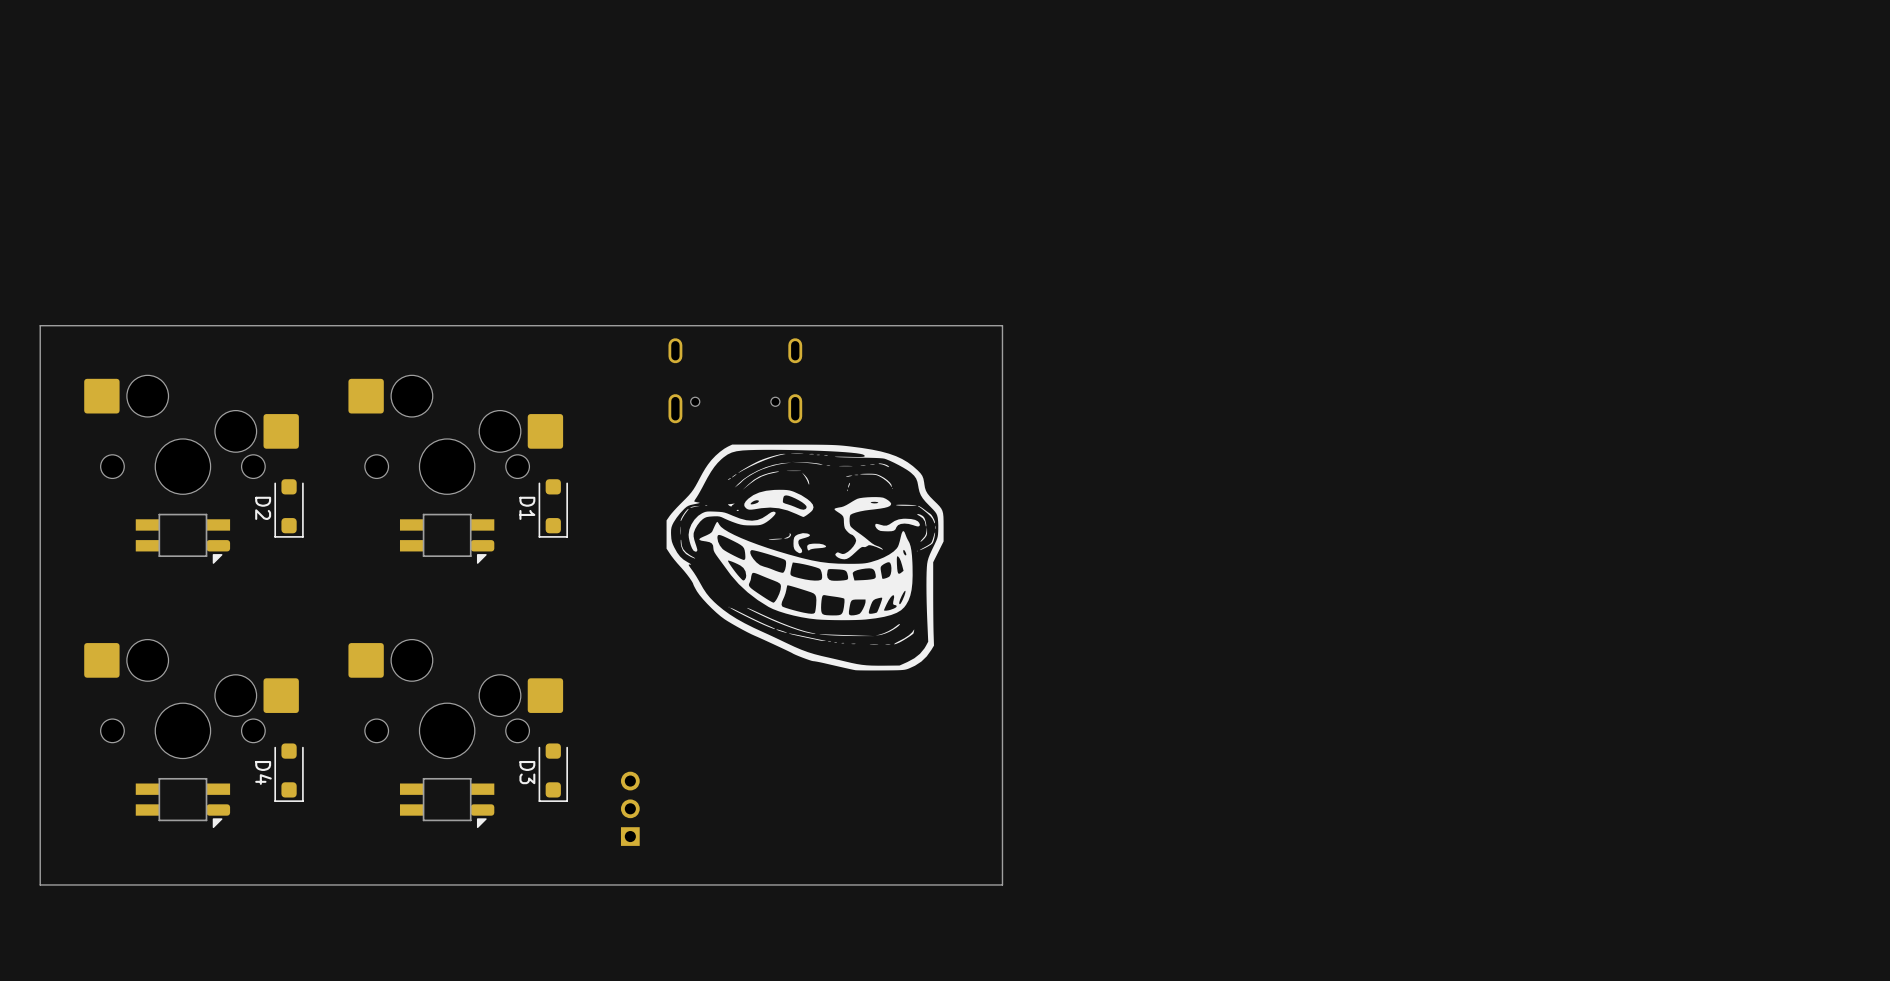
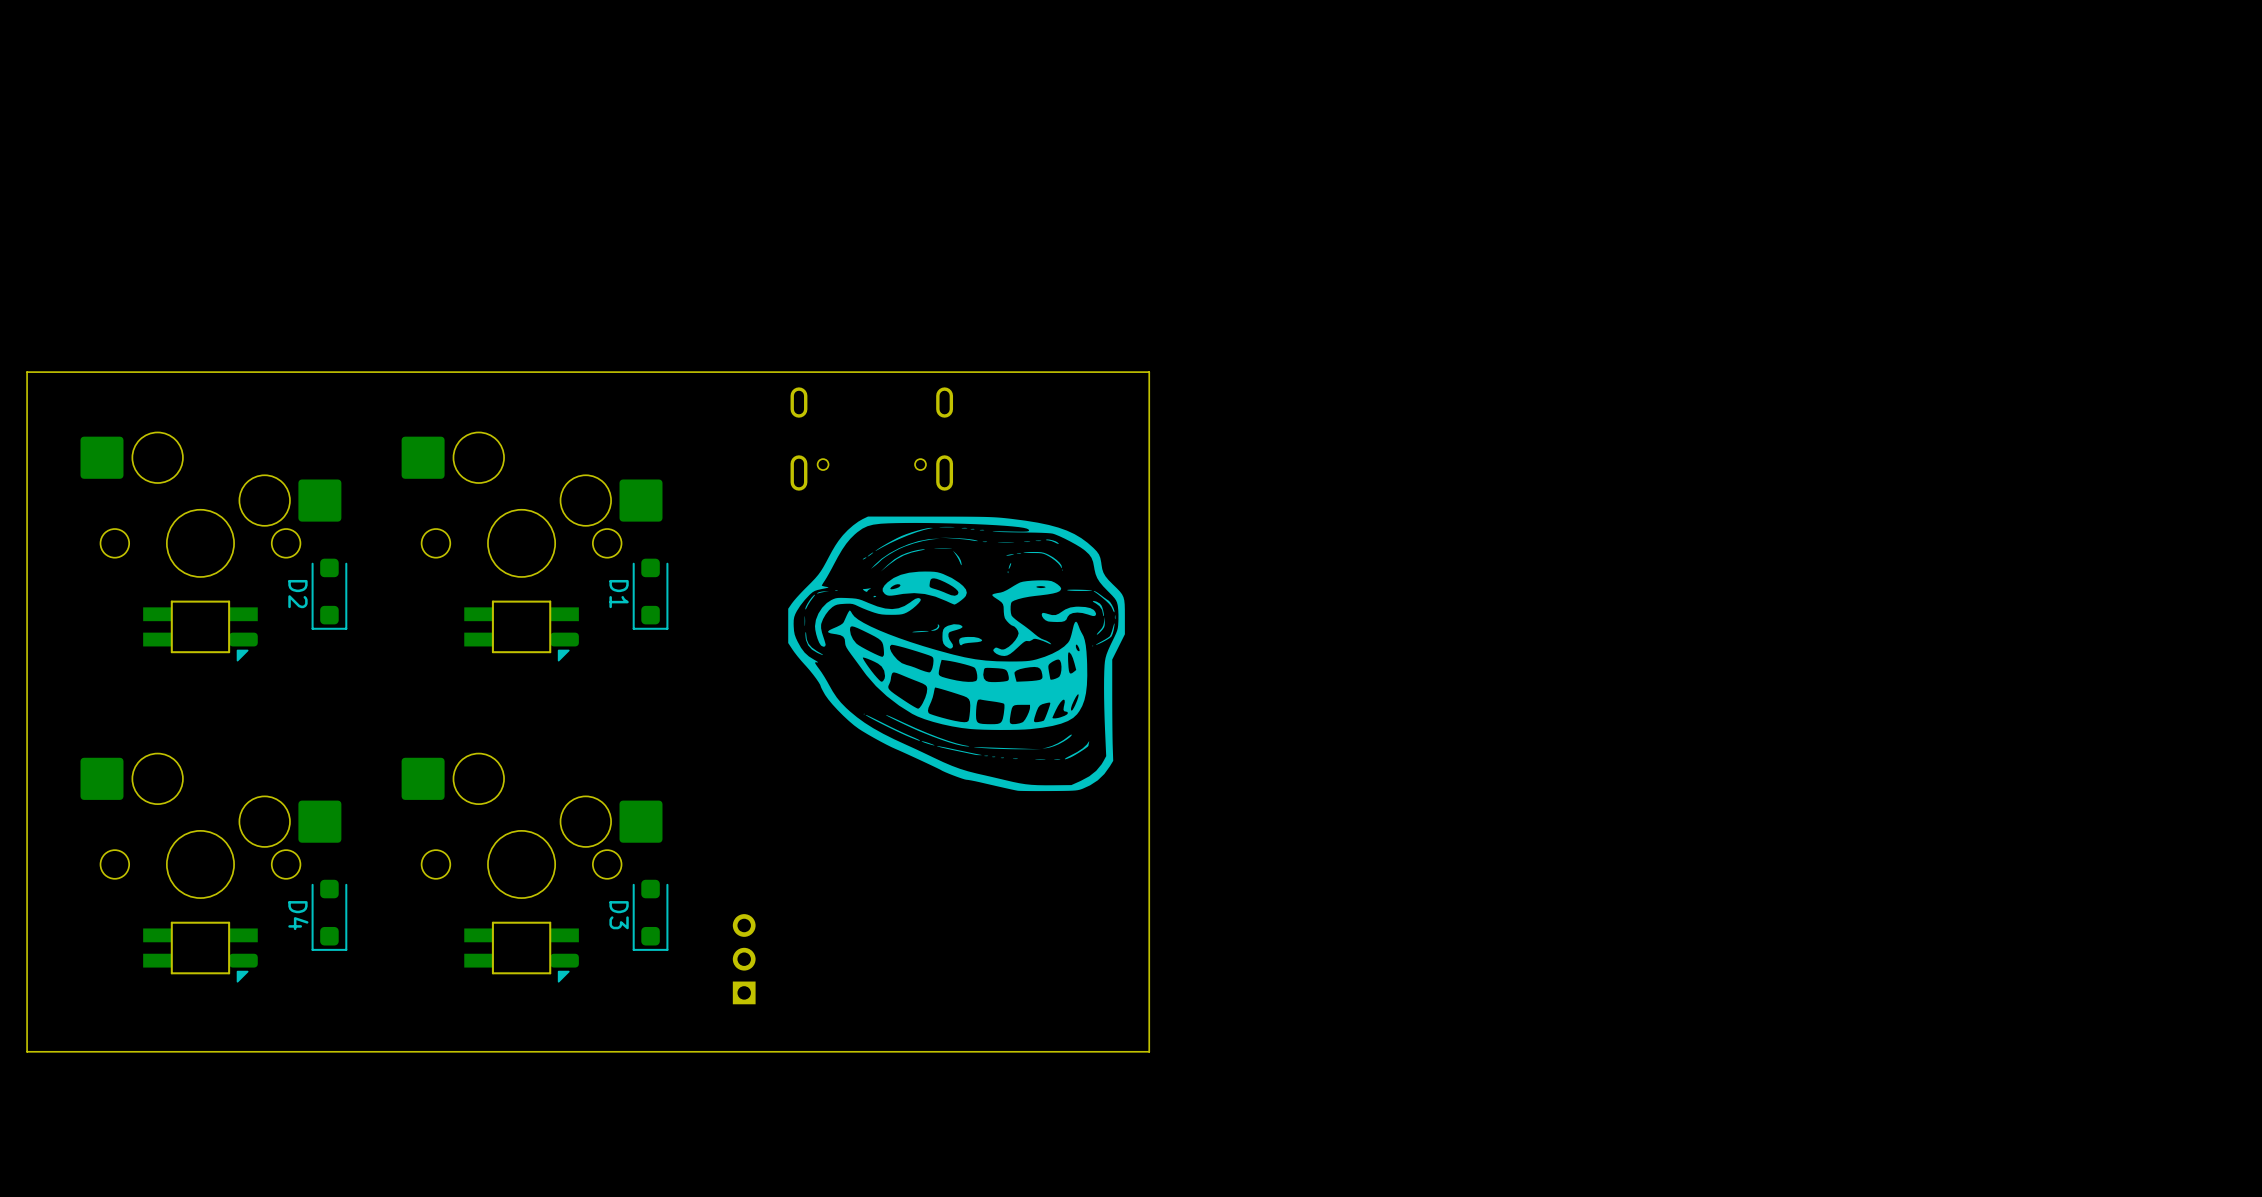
board edge: (963, 325) (1002, 325) (1002, 884) (963, 884) -> (1149, 372) (1149, 1051)

